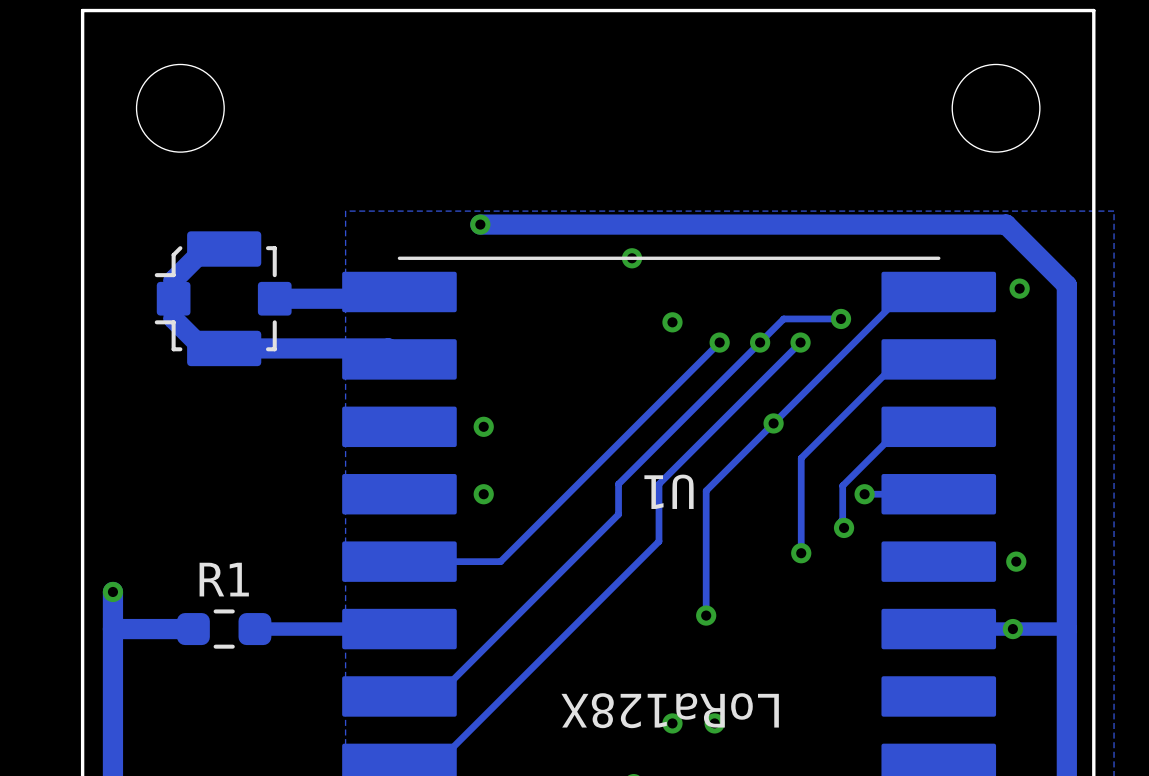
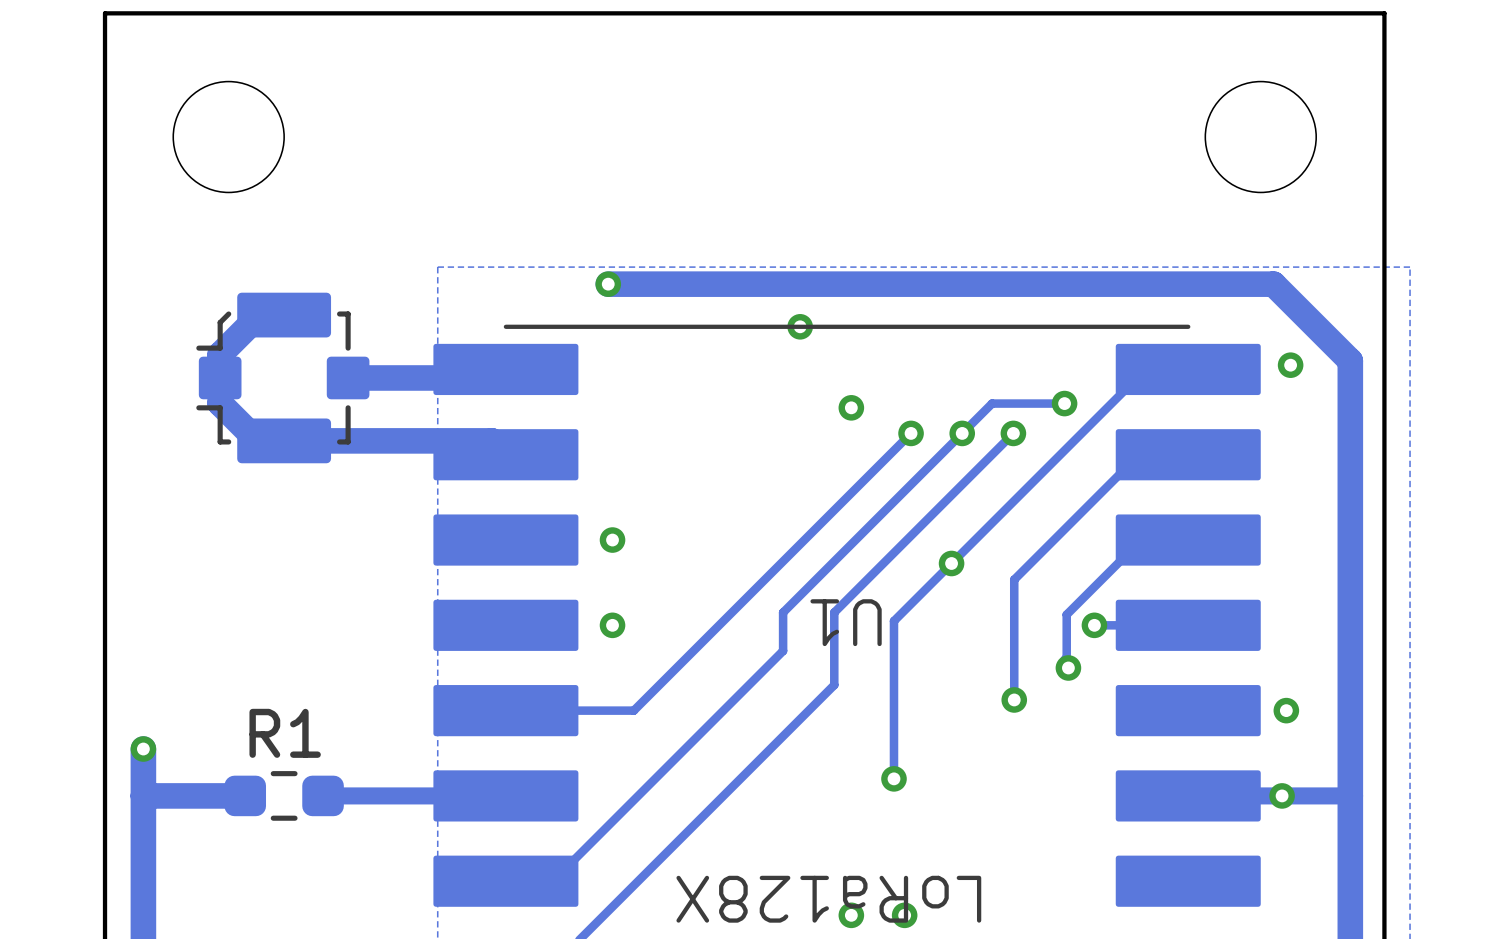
via position: (773, 423) -> (951, 563)

